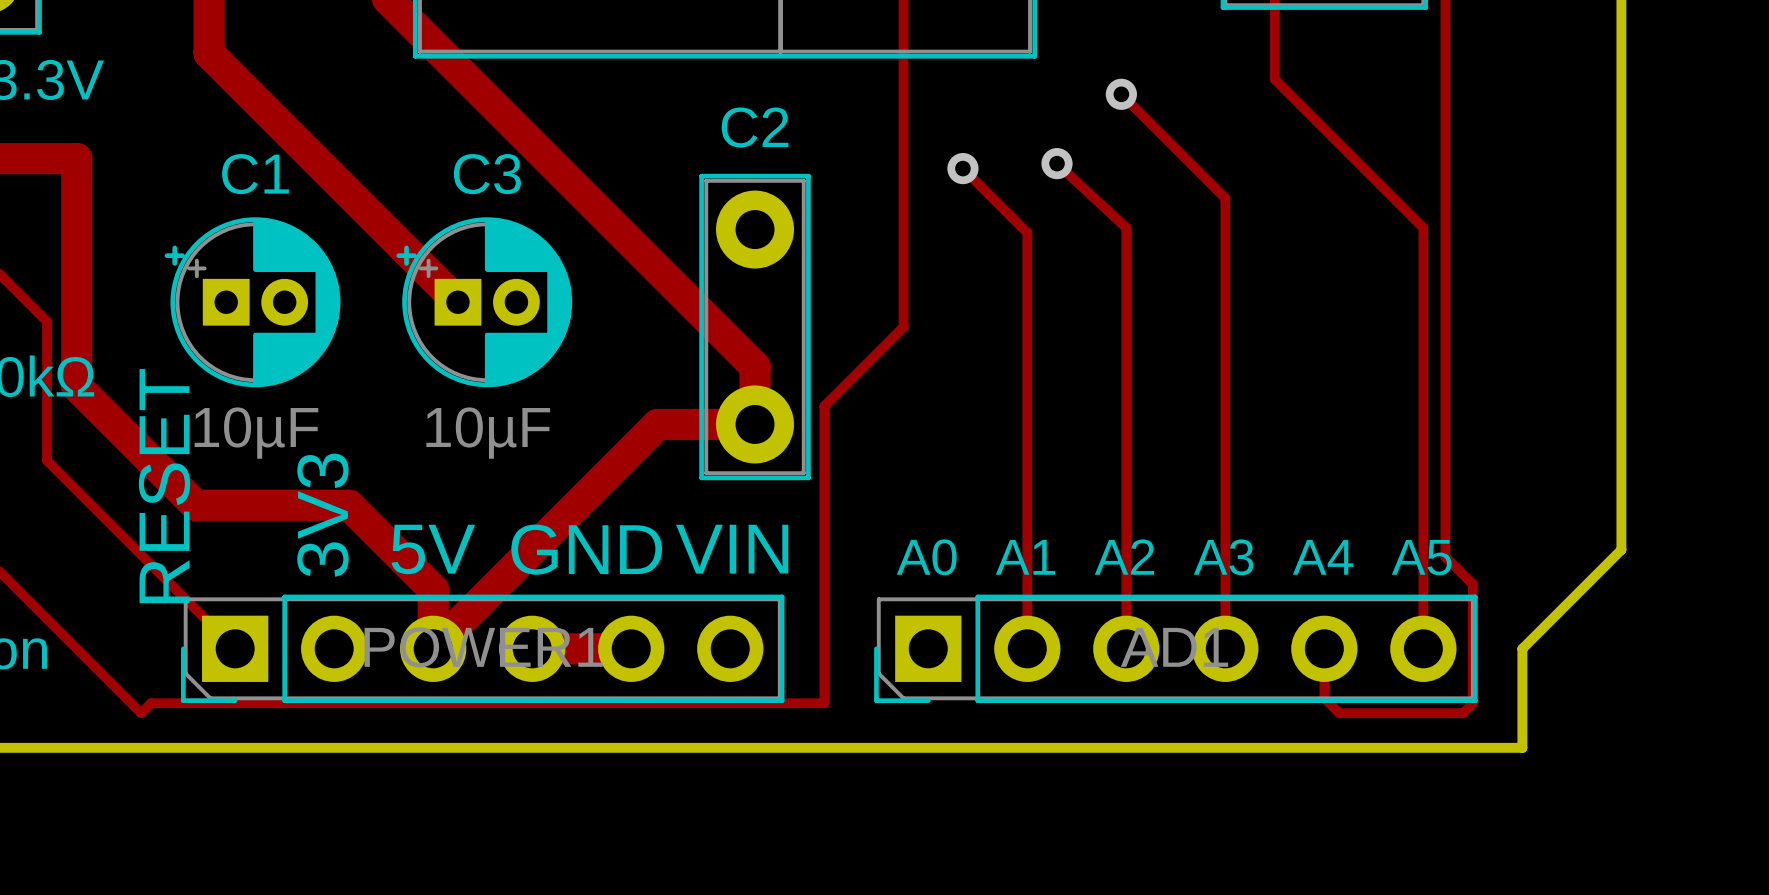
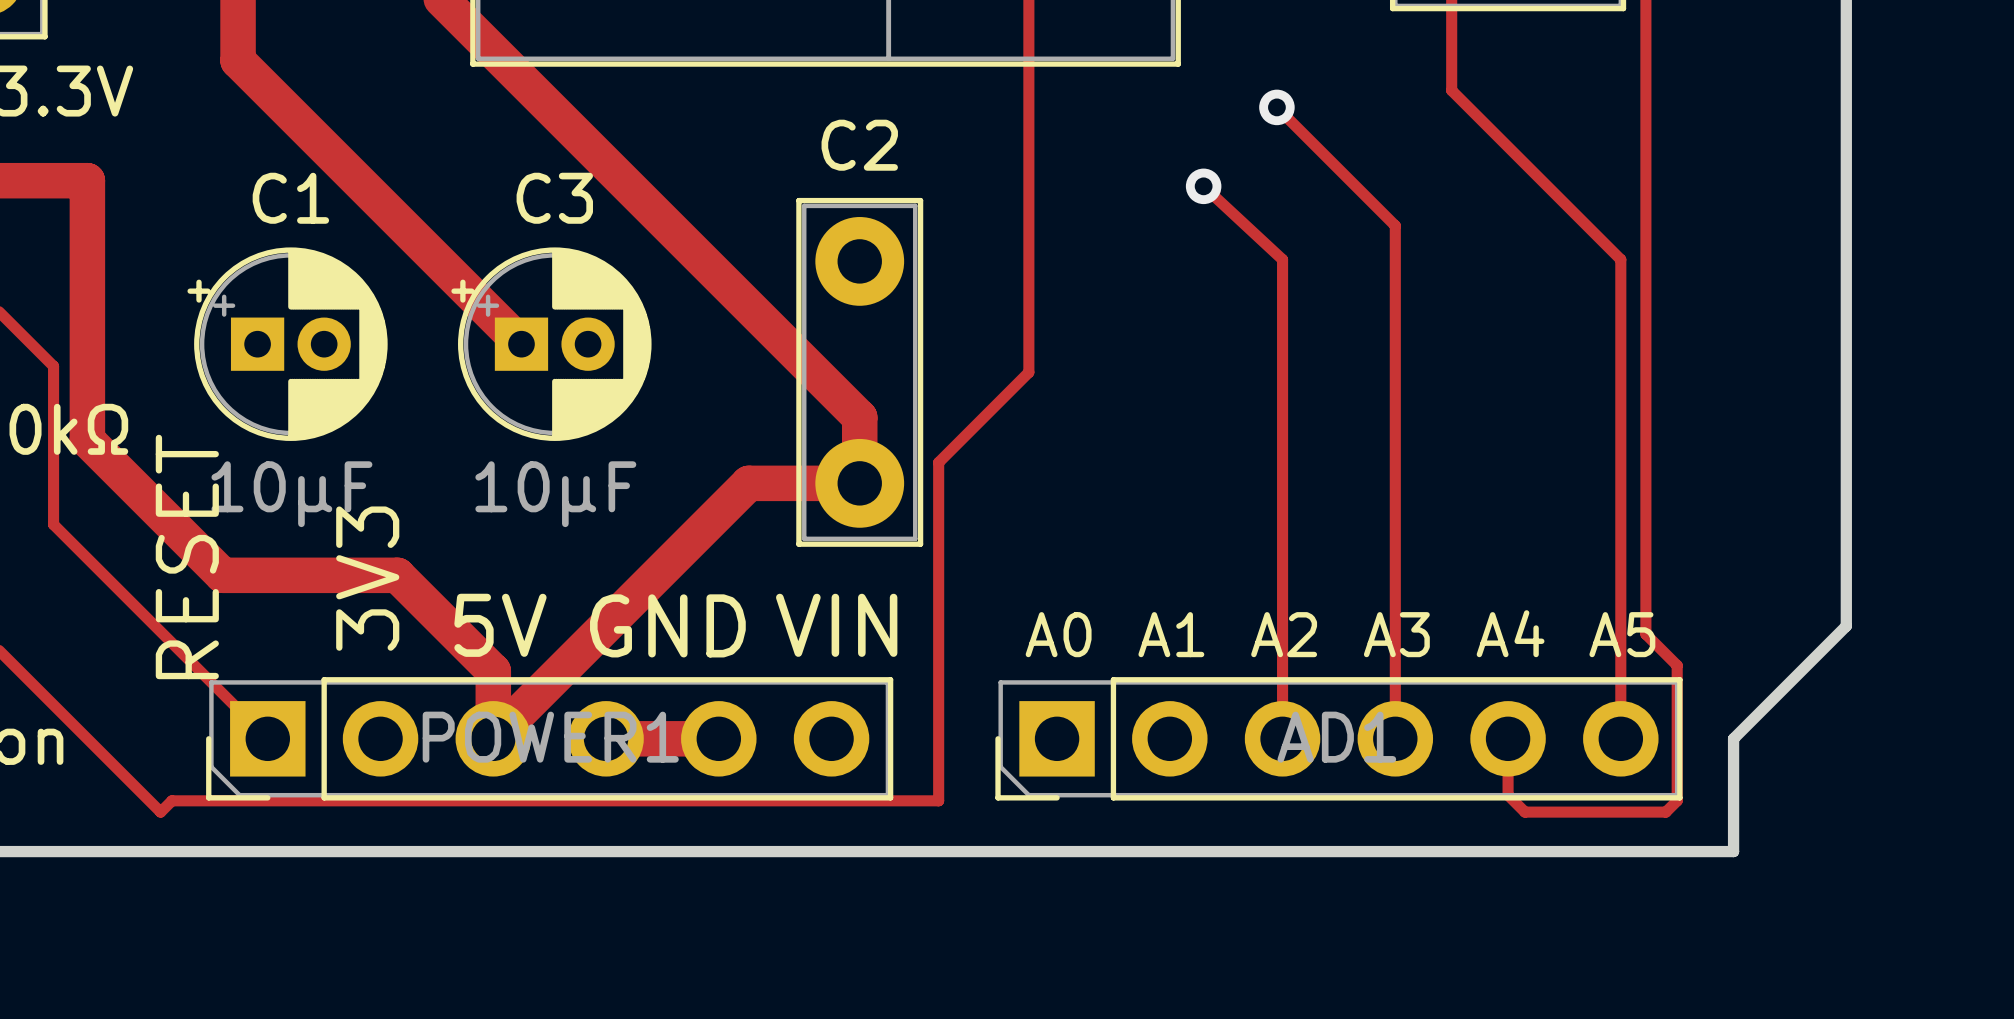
via: (962, 168) -> none
track: (962, 173) (962, 168) (1027, 232) (1027, 648) -> none

